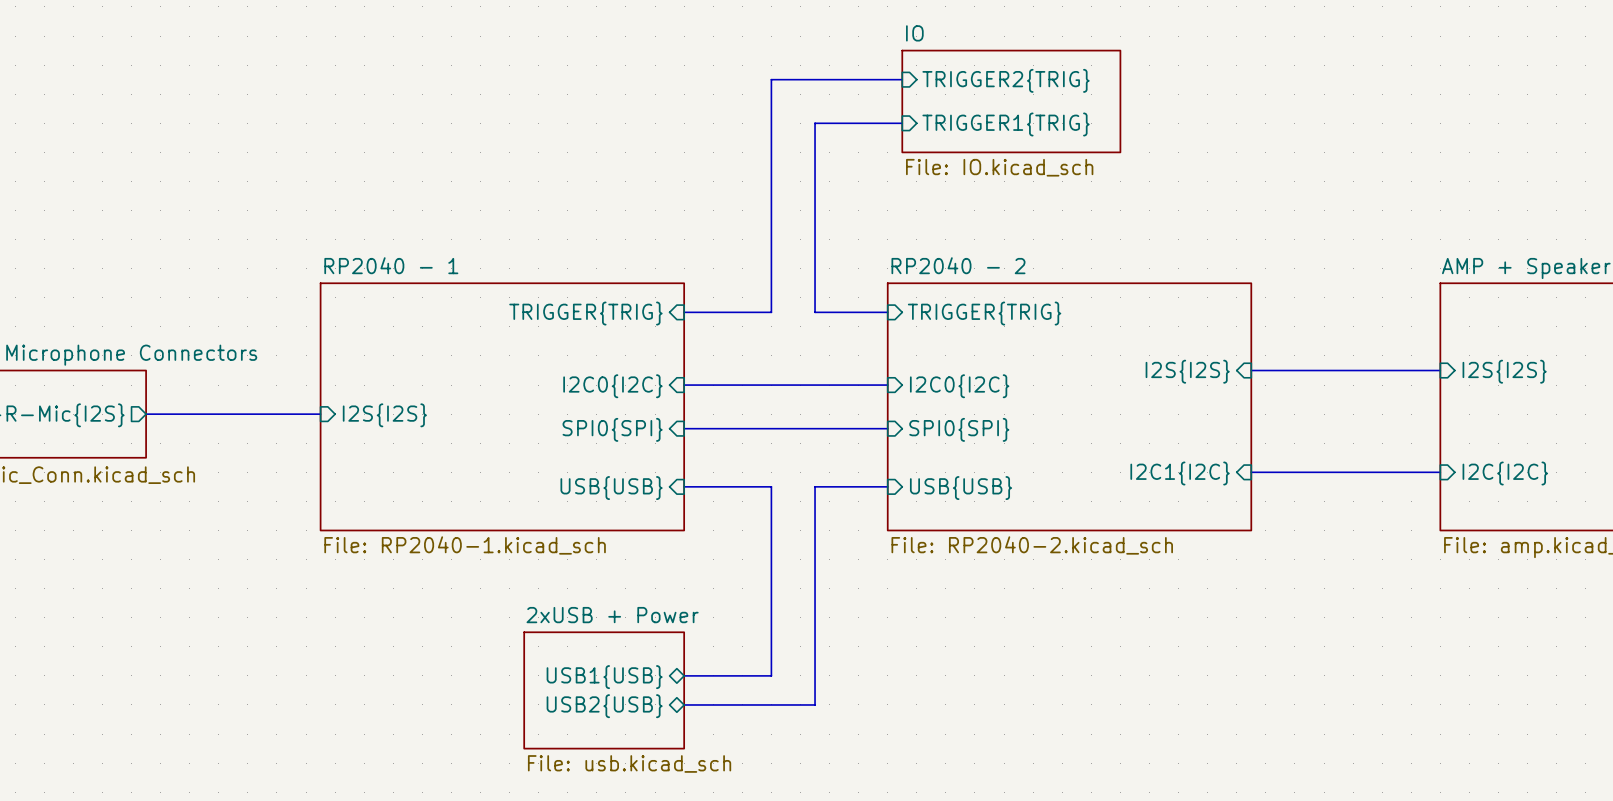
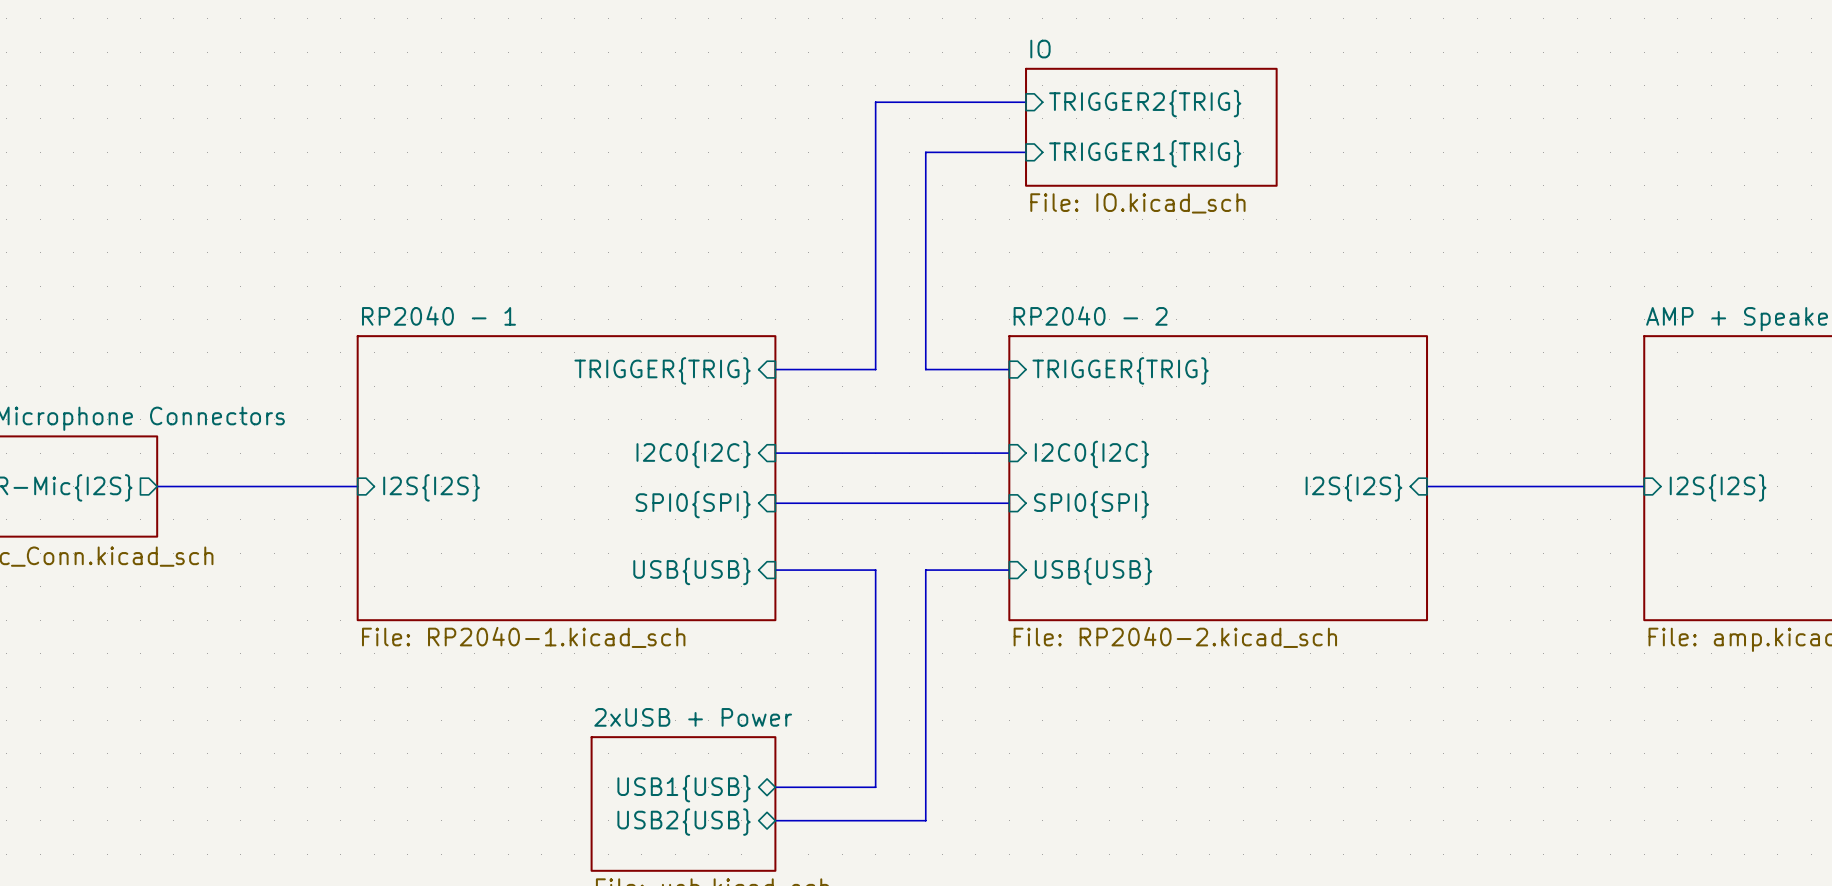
bus: (1251, 370) (1440, 370) -> (1427, 486) (1644, 486)
sheet pin position: I2S{I2S} (1187, 371) -> I2S{I2S} (1353, 487)
sheet pin position: I2S{I2S} (1504, 371) -> I2S{I2S} (1718, 487)
bus: (1251, 472) (1440, 472) -> none
sheet pin: I2C1{I2C} (1180, 473) -> none
sheet pin: I2C{I2C} (1505, 473) -> none

